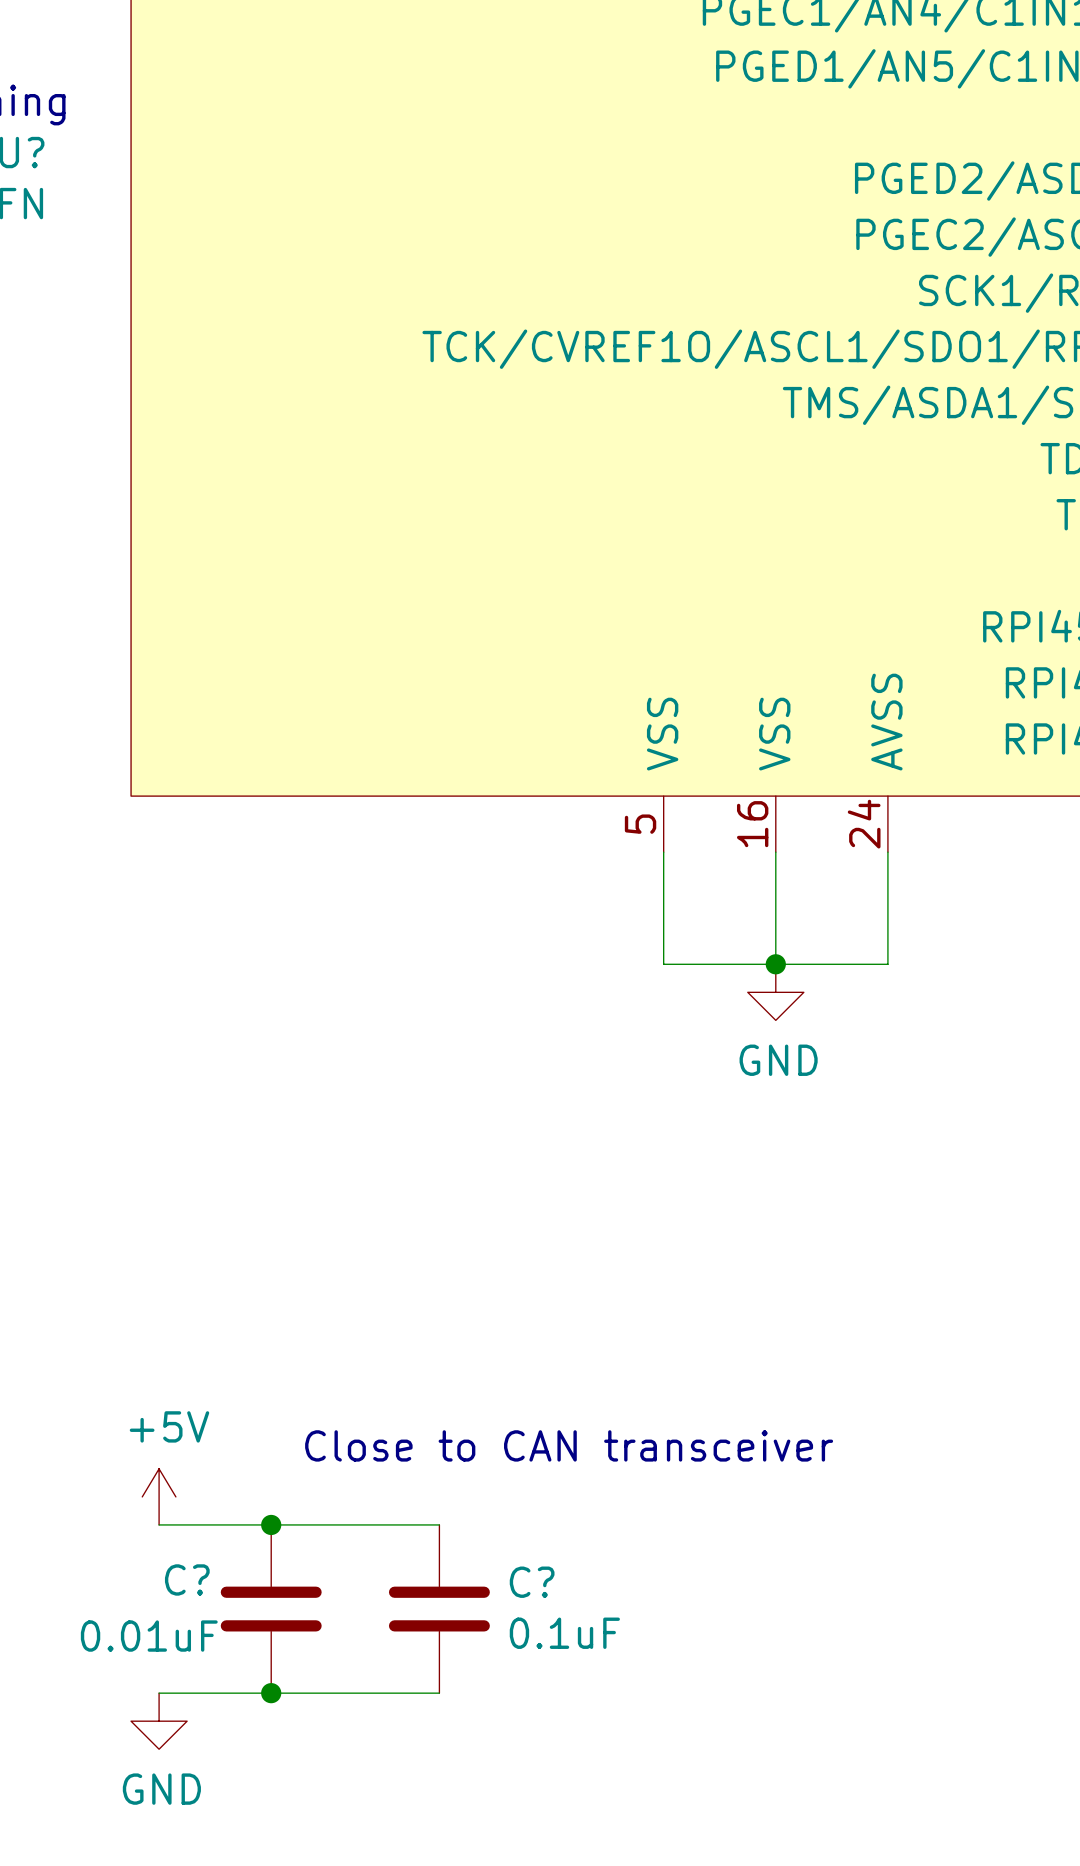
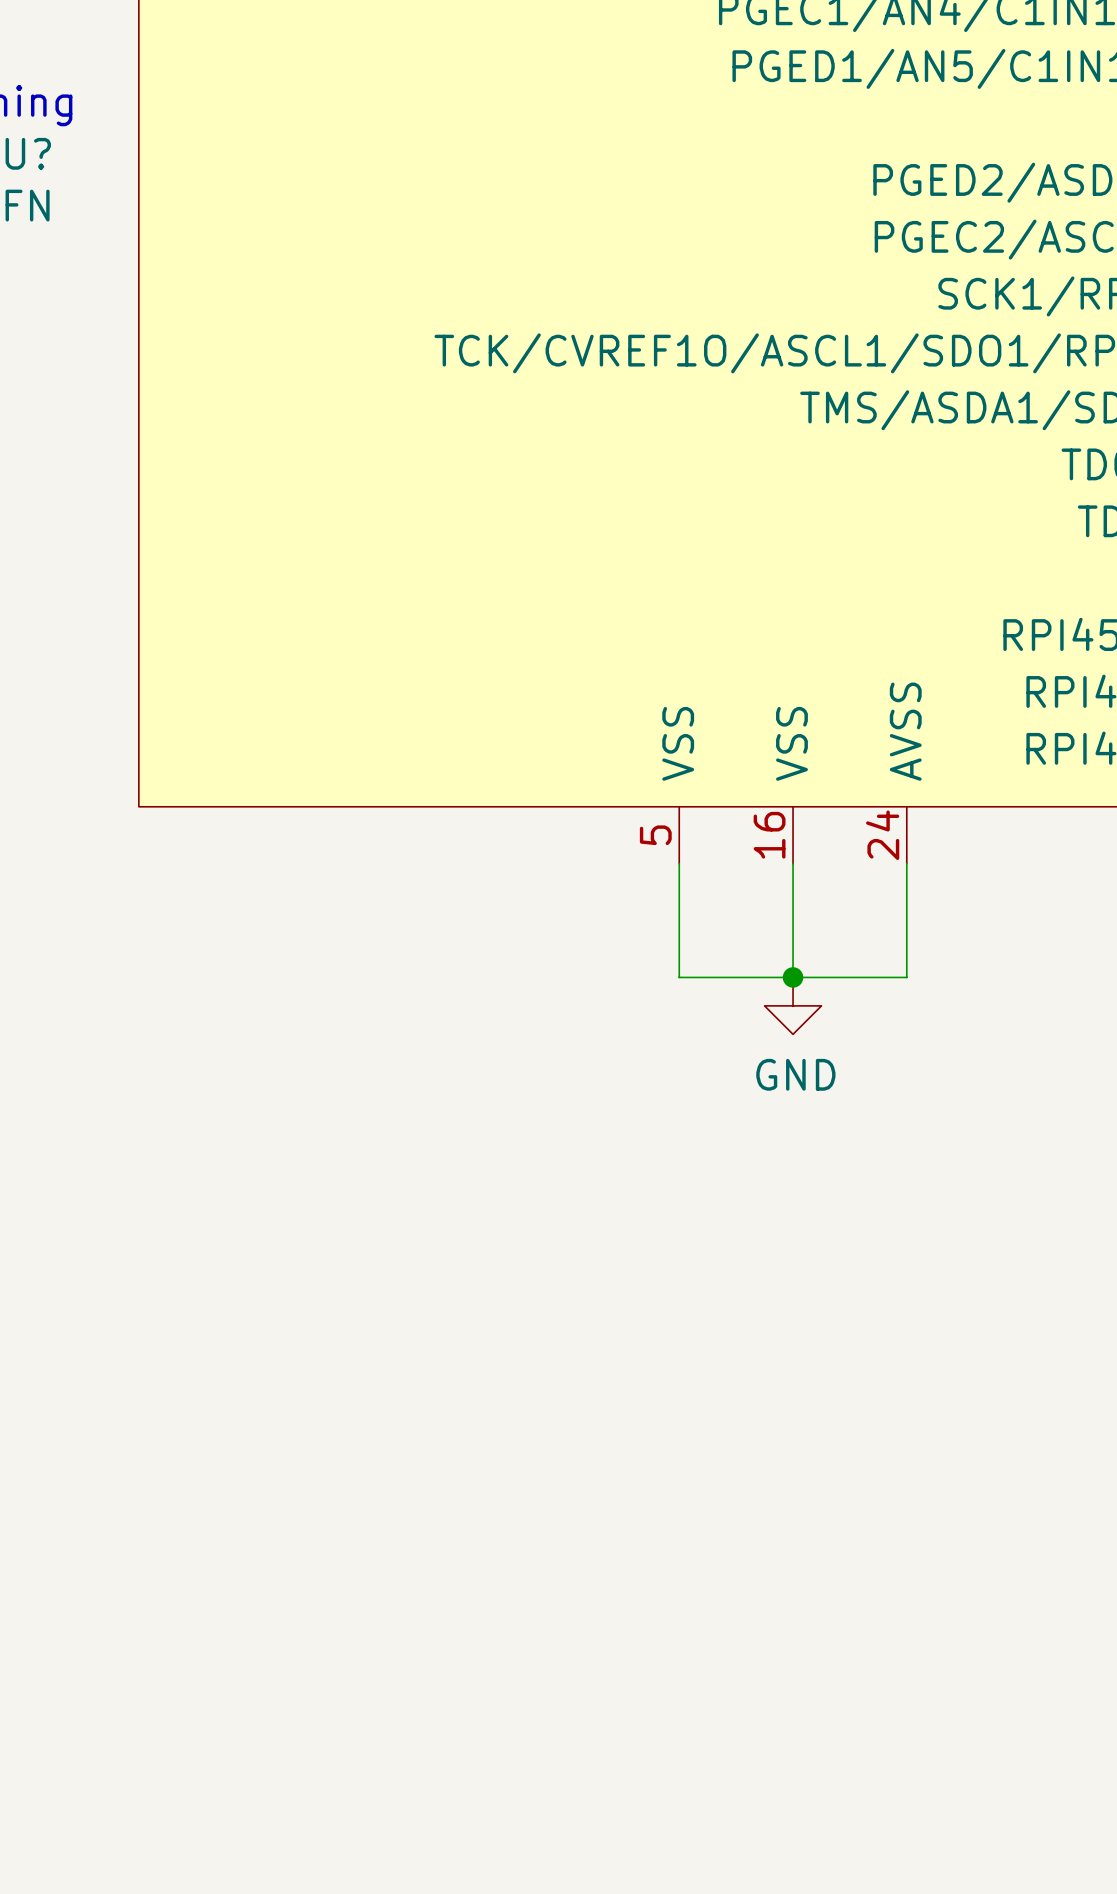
text: Close to CAN transceiver (569, 1445) -> none
power symbol: +5V (159, 1496) -> none
wire: (159, 1524) (439, 1524) -> none
junction: (271, 1524) -> none
C?: 0.01uF (271, 1609) -> none
C?: 0.1uF (439, 1609) -> none
wire: (159, 1693) (439, 1693) -> none
junction: (271, 1693) -> none
power symbol: GND (159, 1721) -> none

